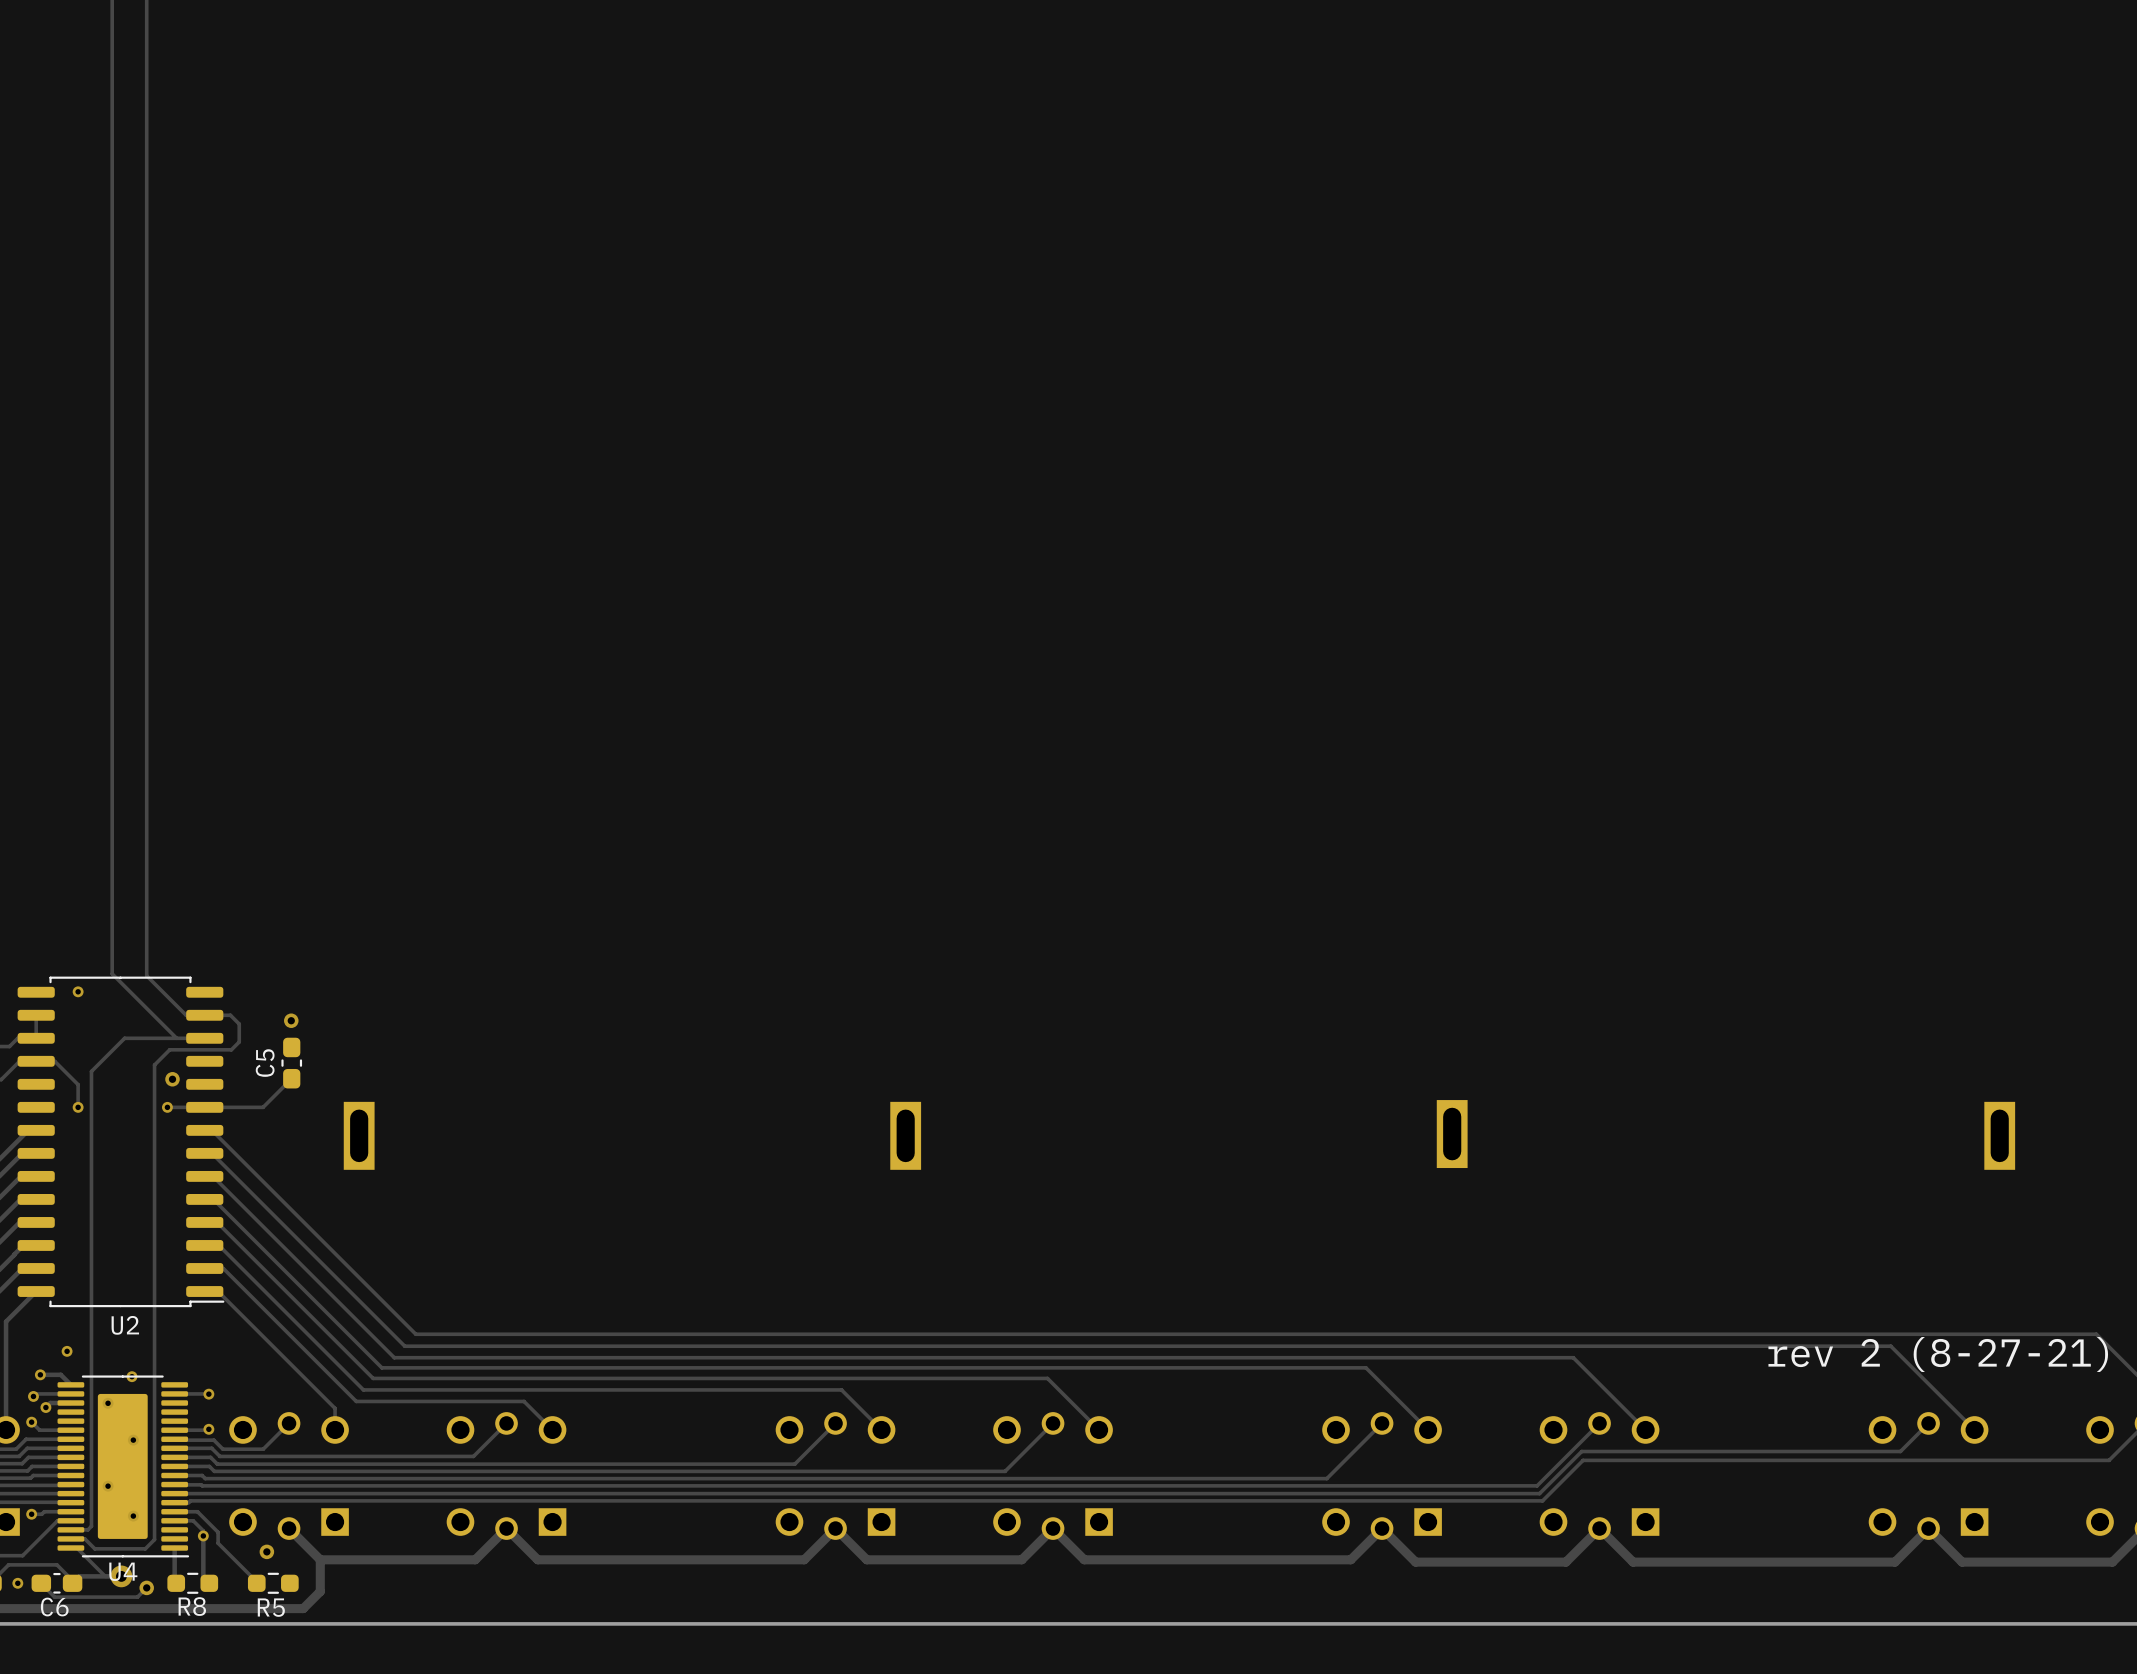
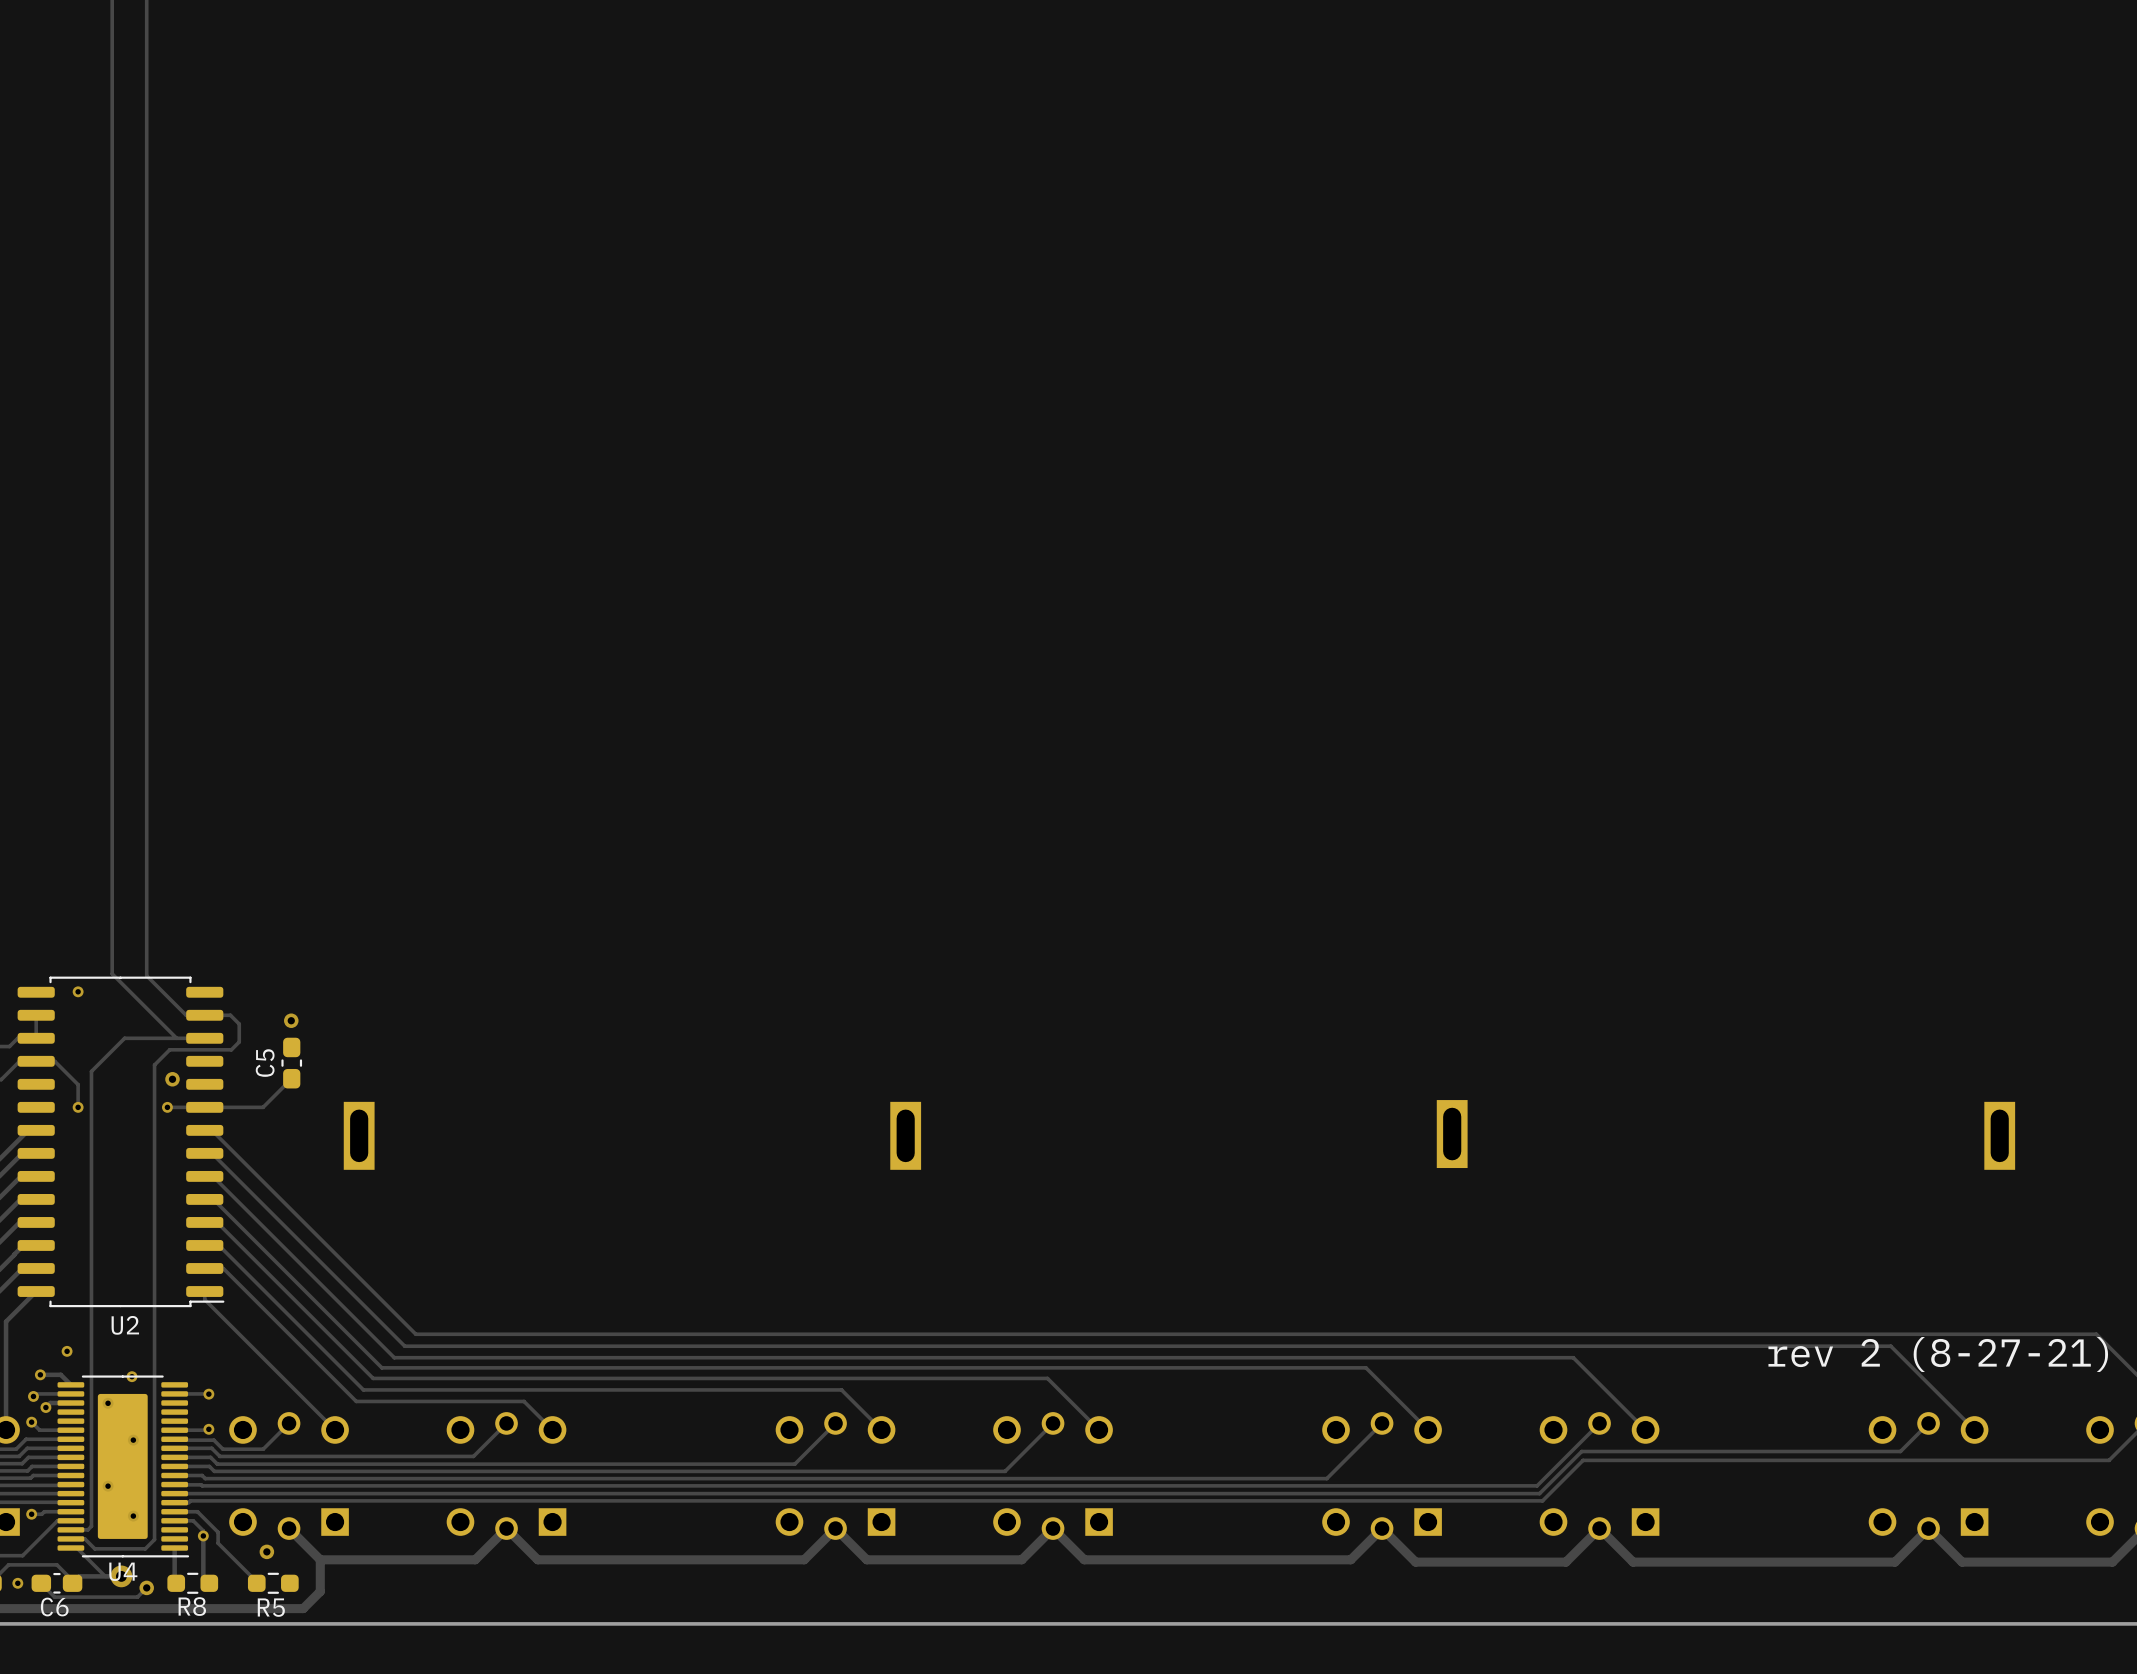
track: (204, 1291) (218, 1291) (335, 1408) (335, 1429) -> (204, 1291) (204, 1299) (335, 1429)

